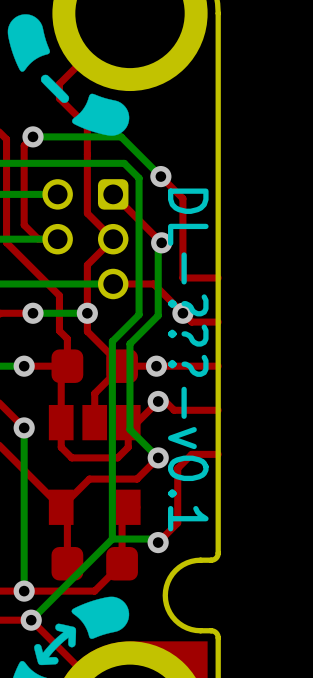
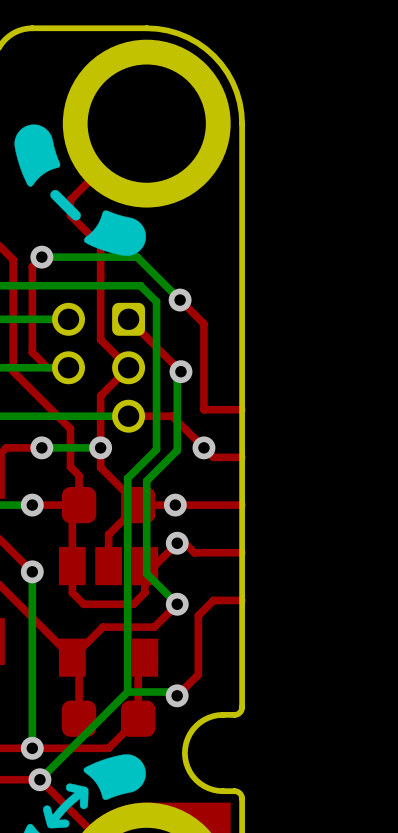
text: DL-???-v0.1 (188, 359) -> none

